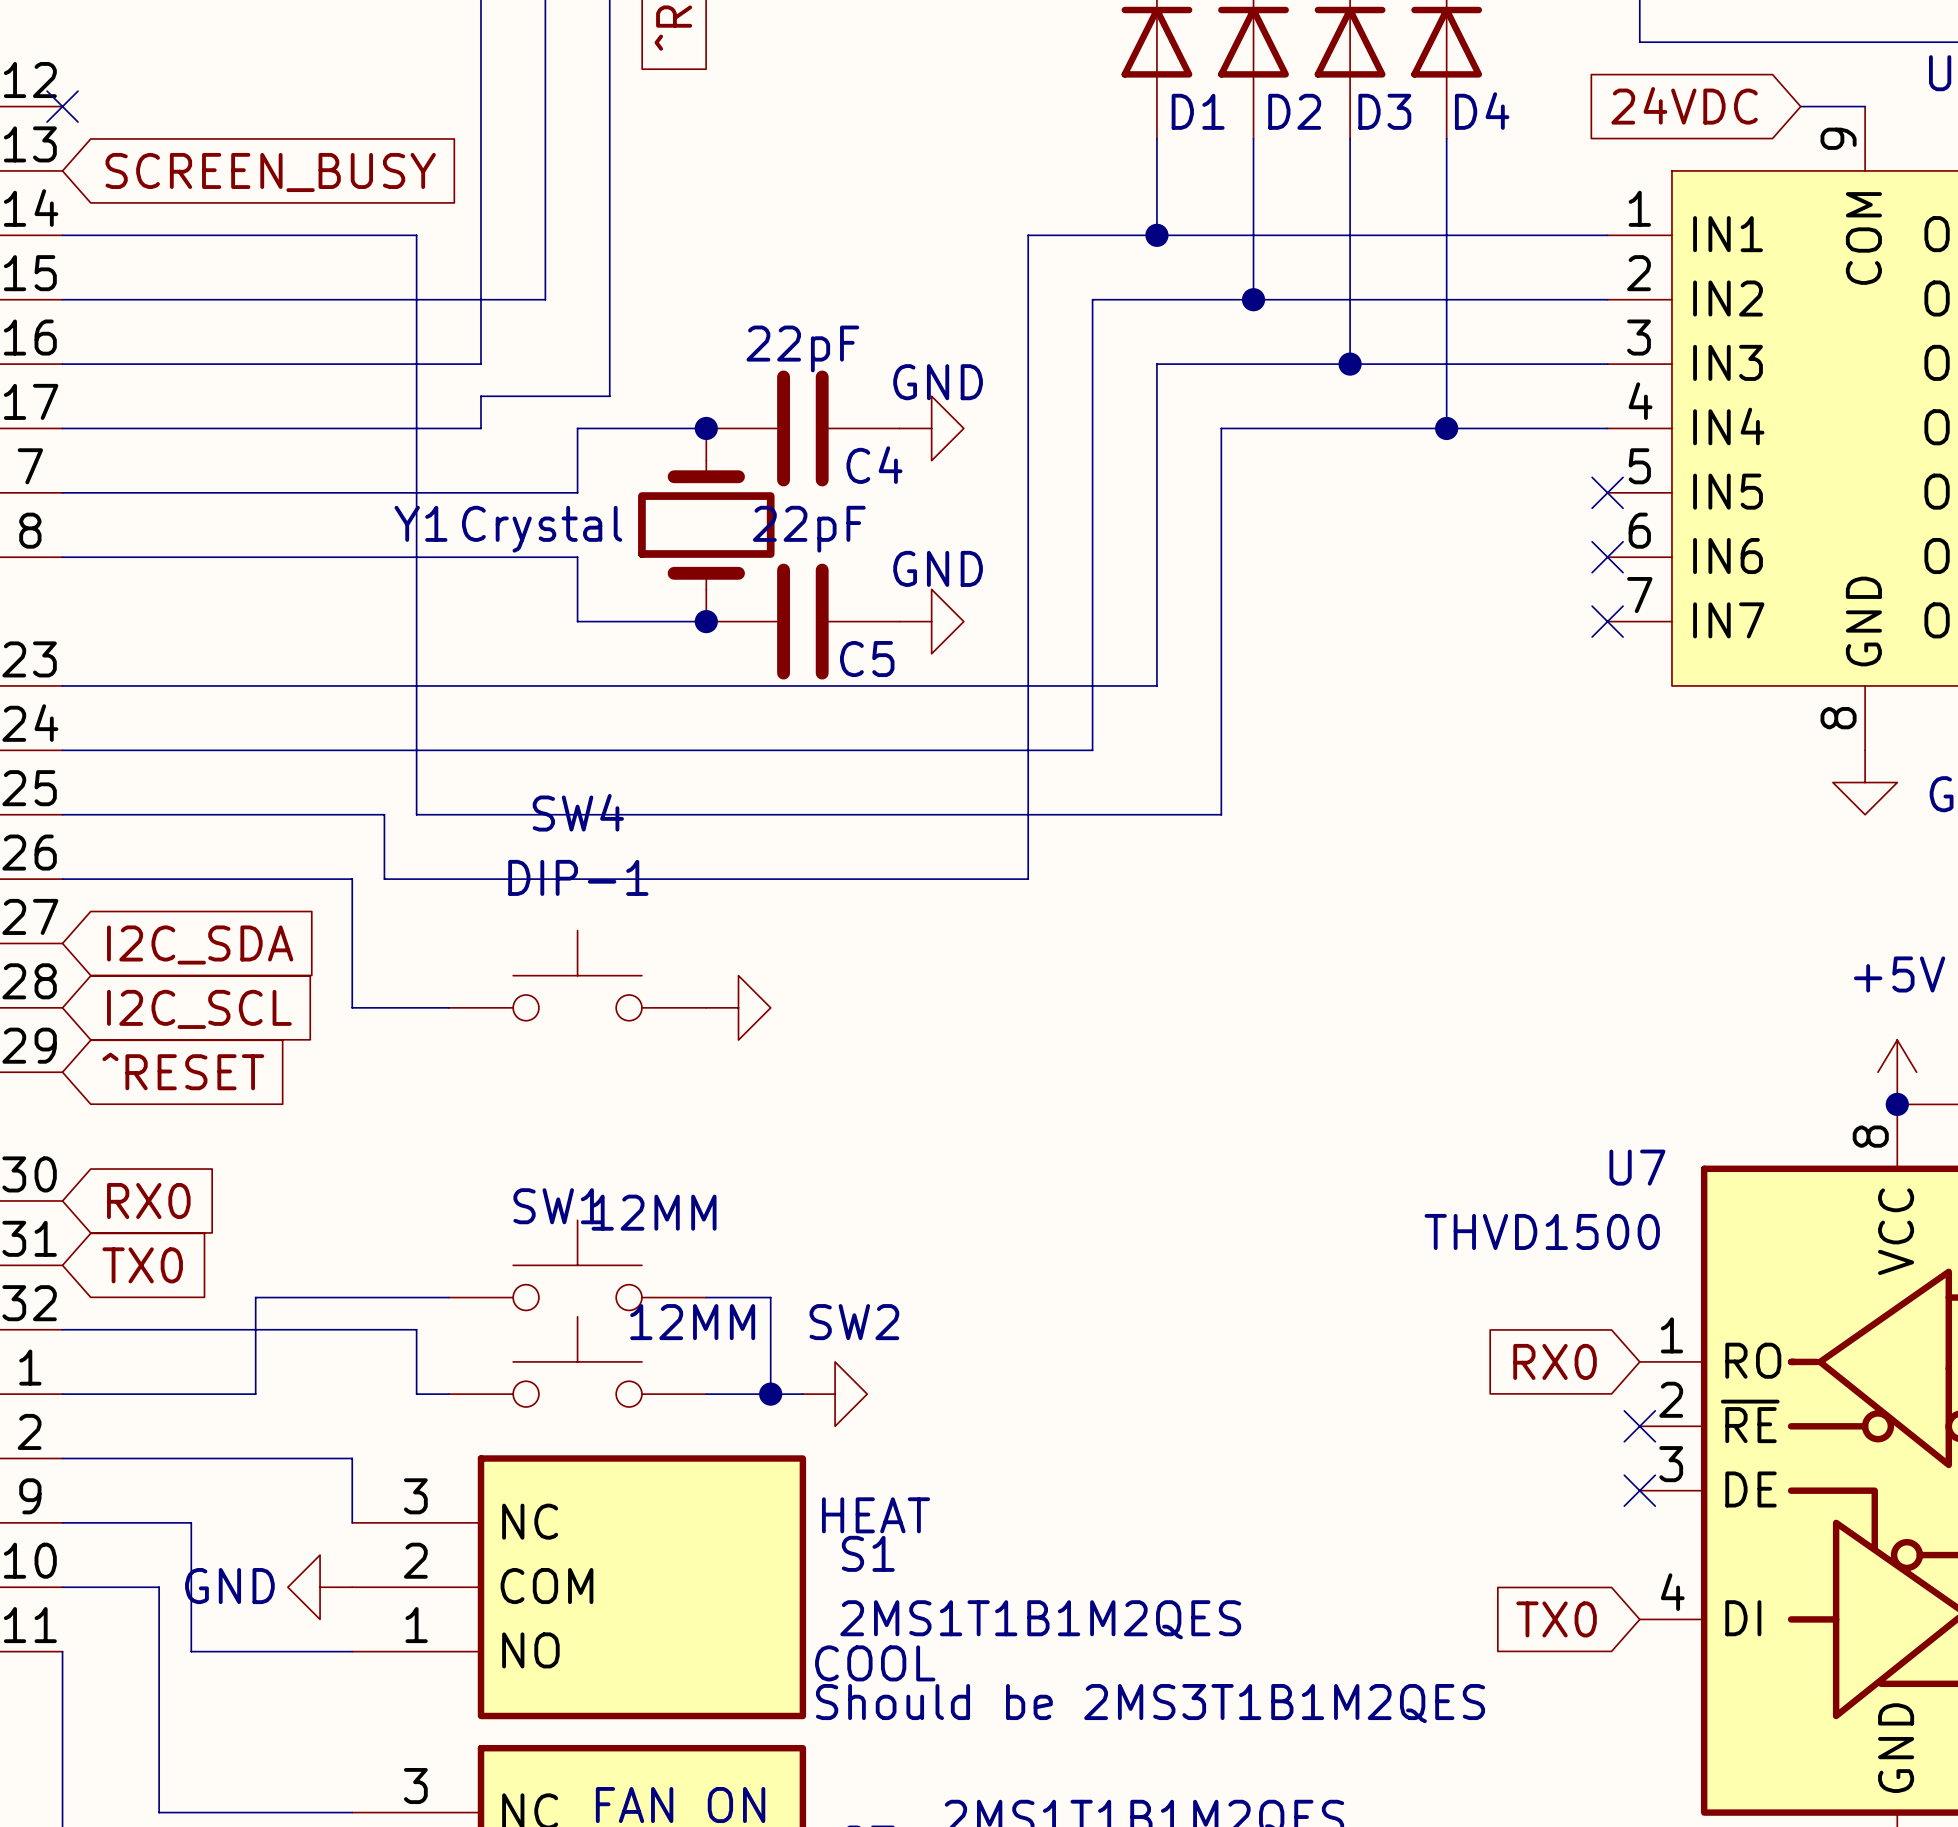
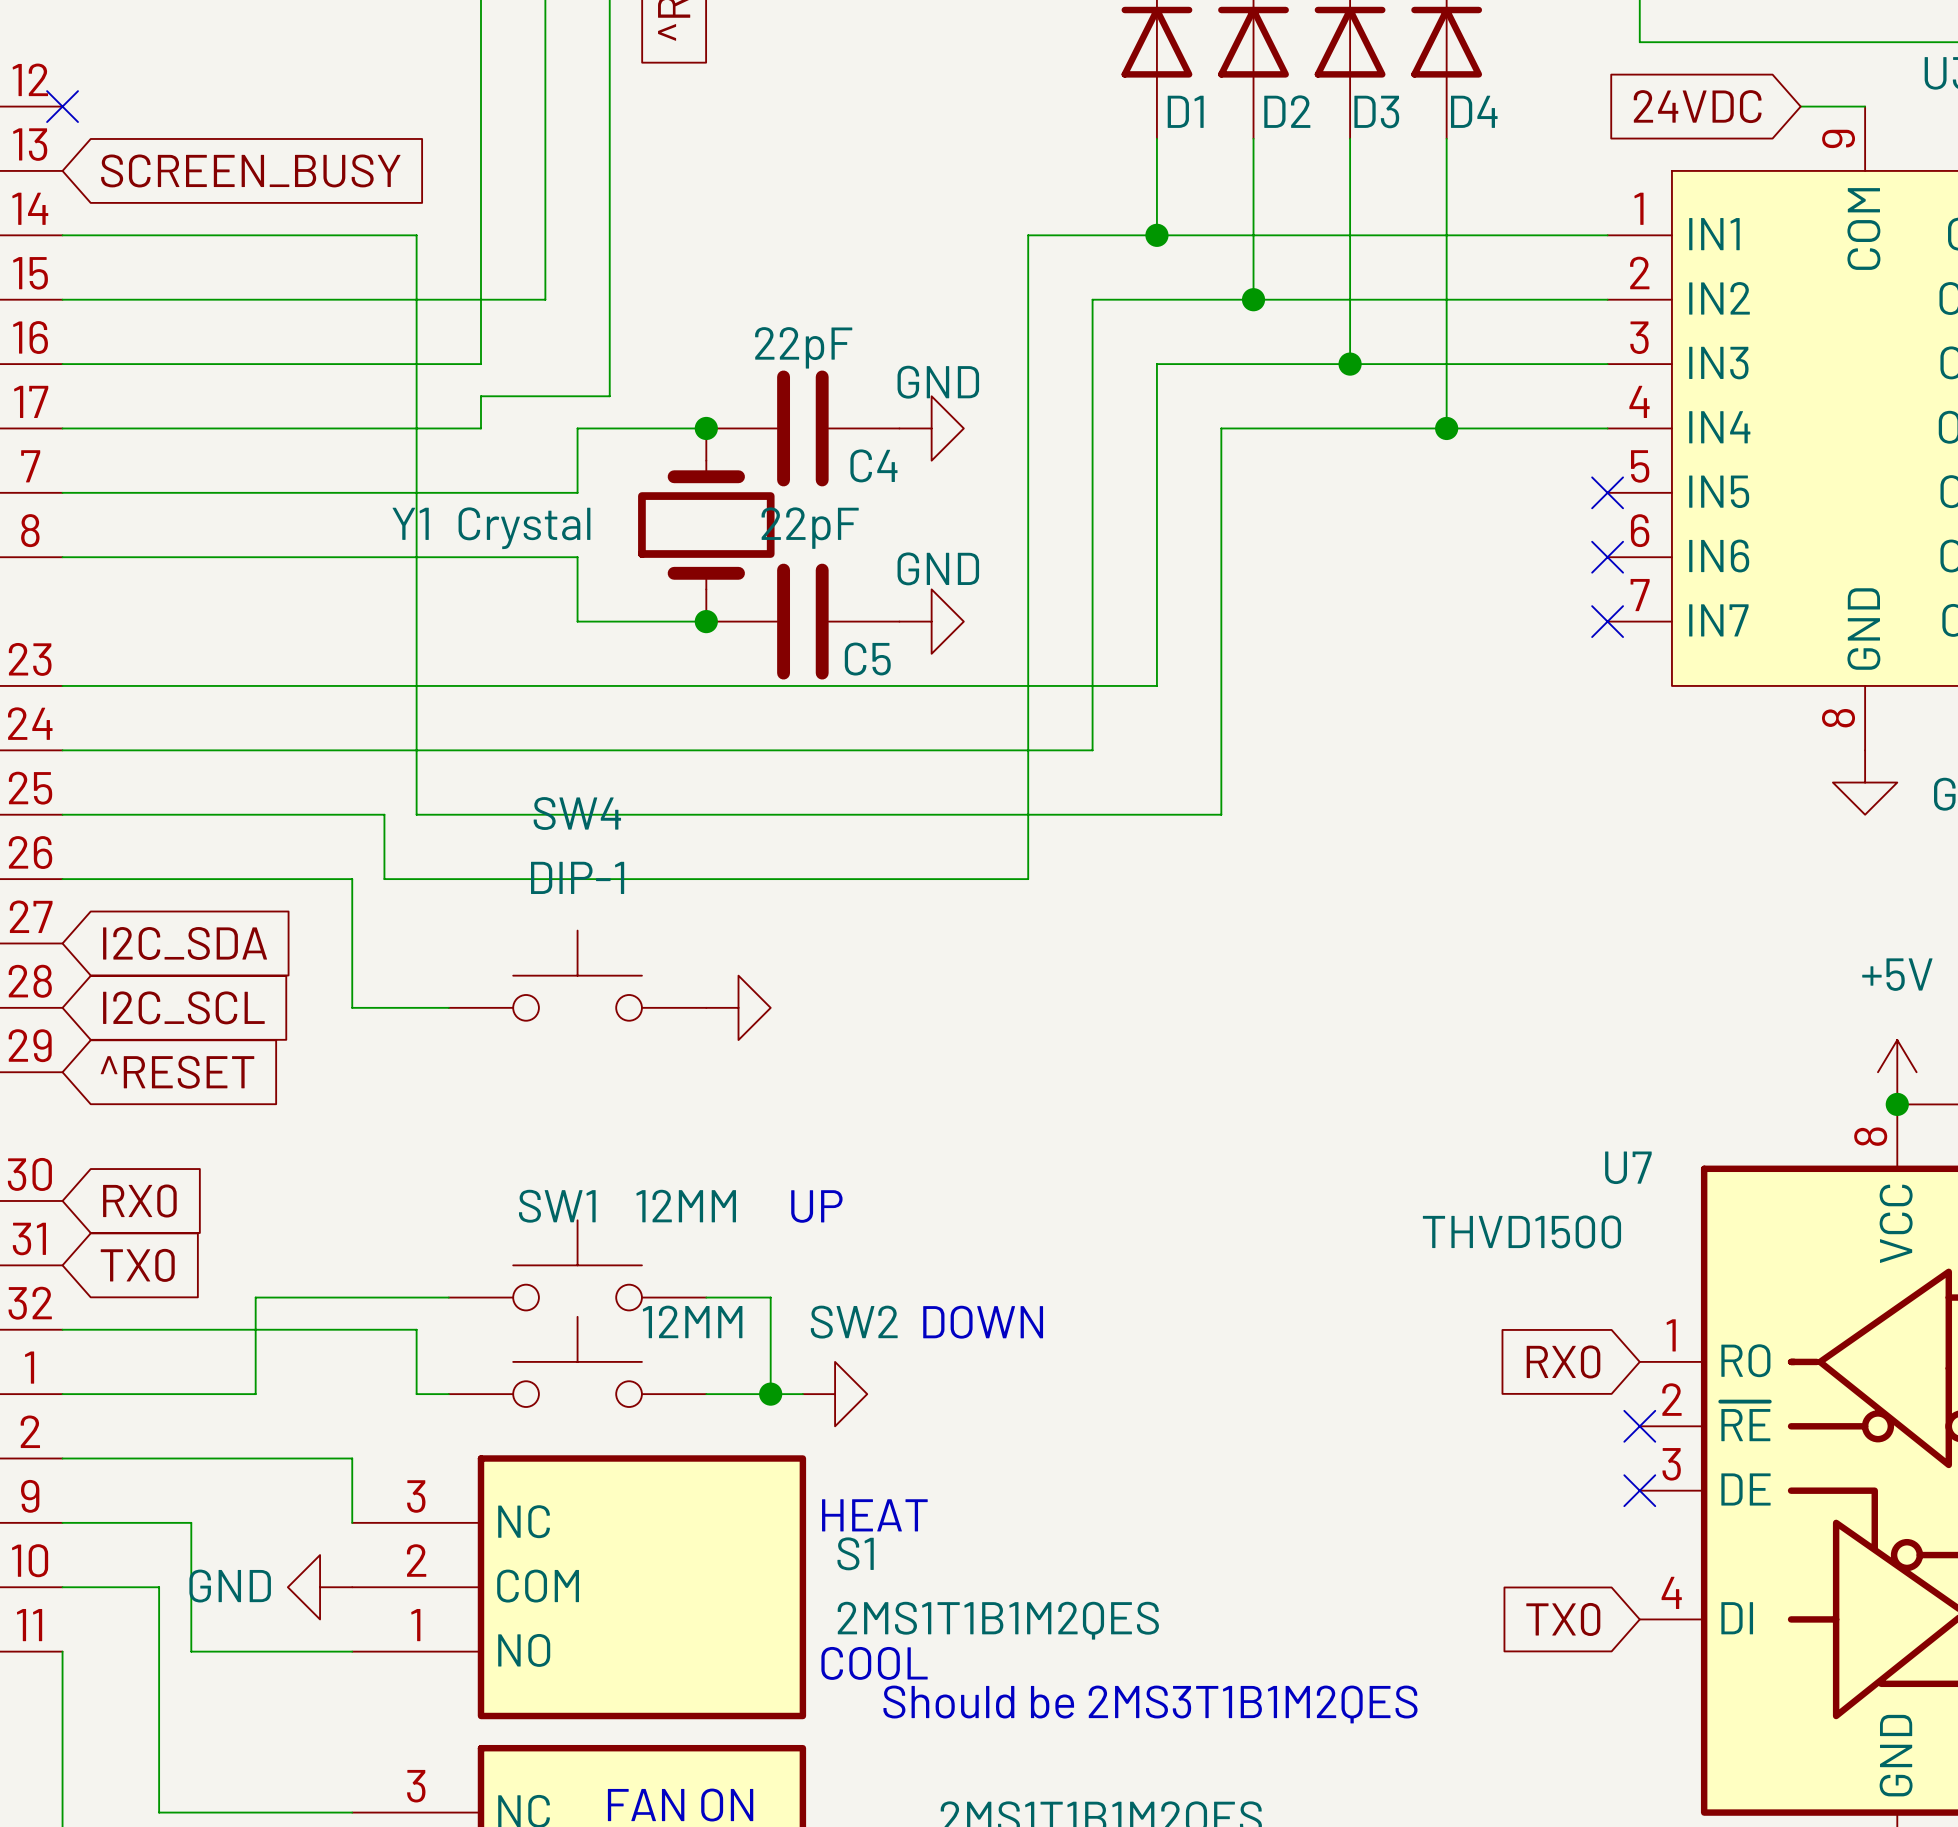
text: none -> UP (816, 1206)
SW1 value position: 12MM (654, 1212) -> 12MM (686, 1206)
text: none -> DOWN (983, 1322)

